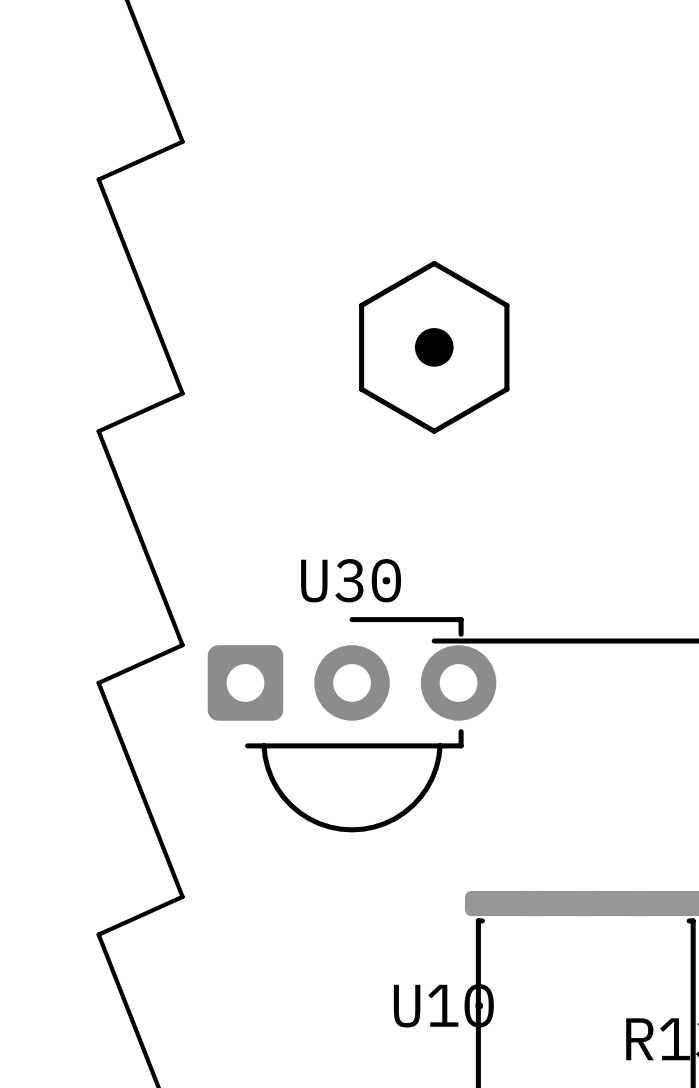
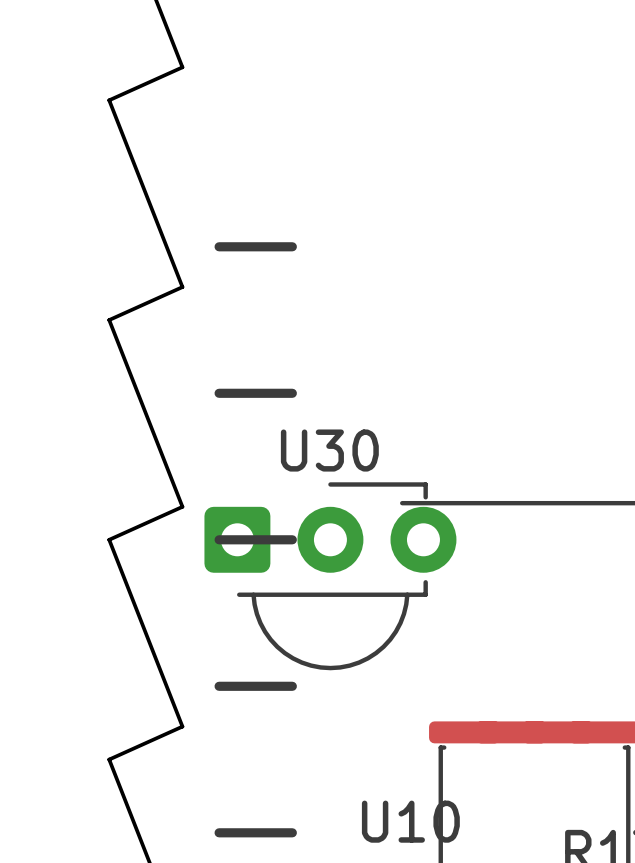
line: (434, 263) (361, 305) (361, 389) (434, 431) (506, 389) (506, 305) (434, 263) -> none
drawing: [414, 328, 454, 367] -> none
line: none -> (219, 246) (292, 246)
line: none -> (219, 393) (292, 393)
line: none -> (219, 539) (292, 539)
line: none -> (219, 686) (292, 686)
line: none -> (219, 832) (292, 832)

